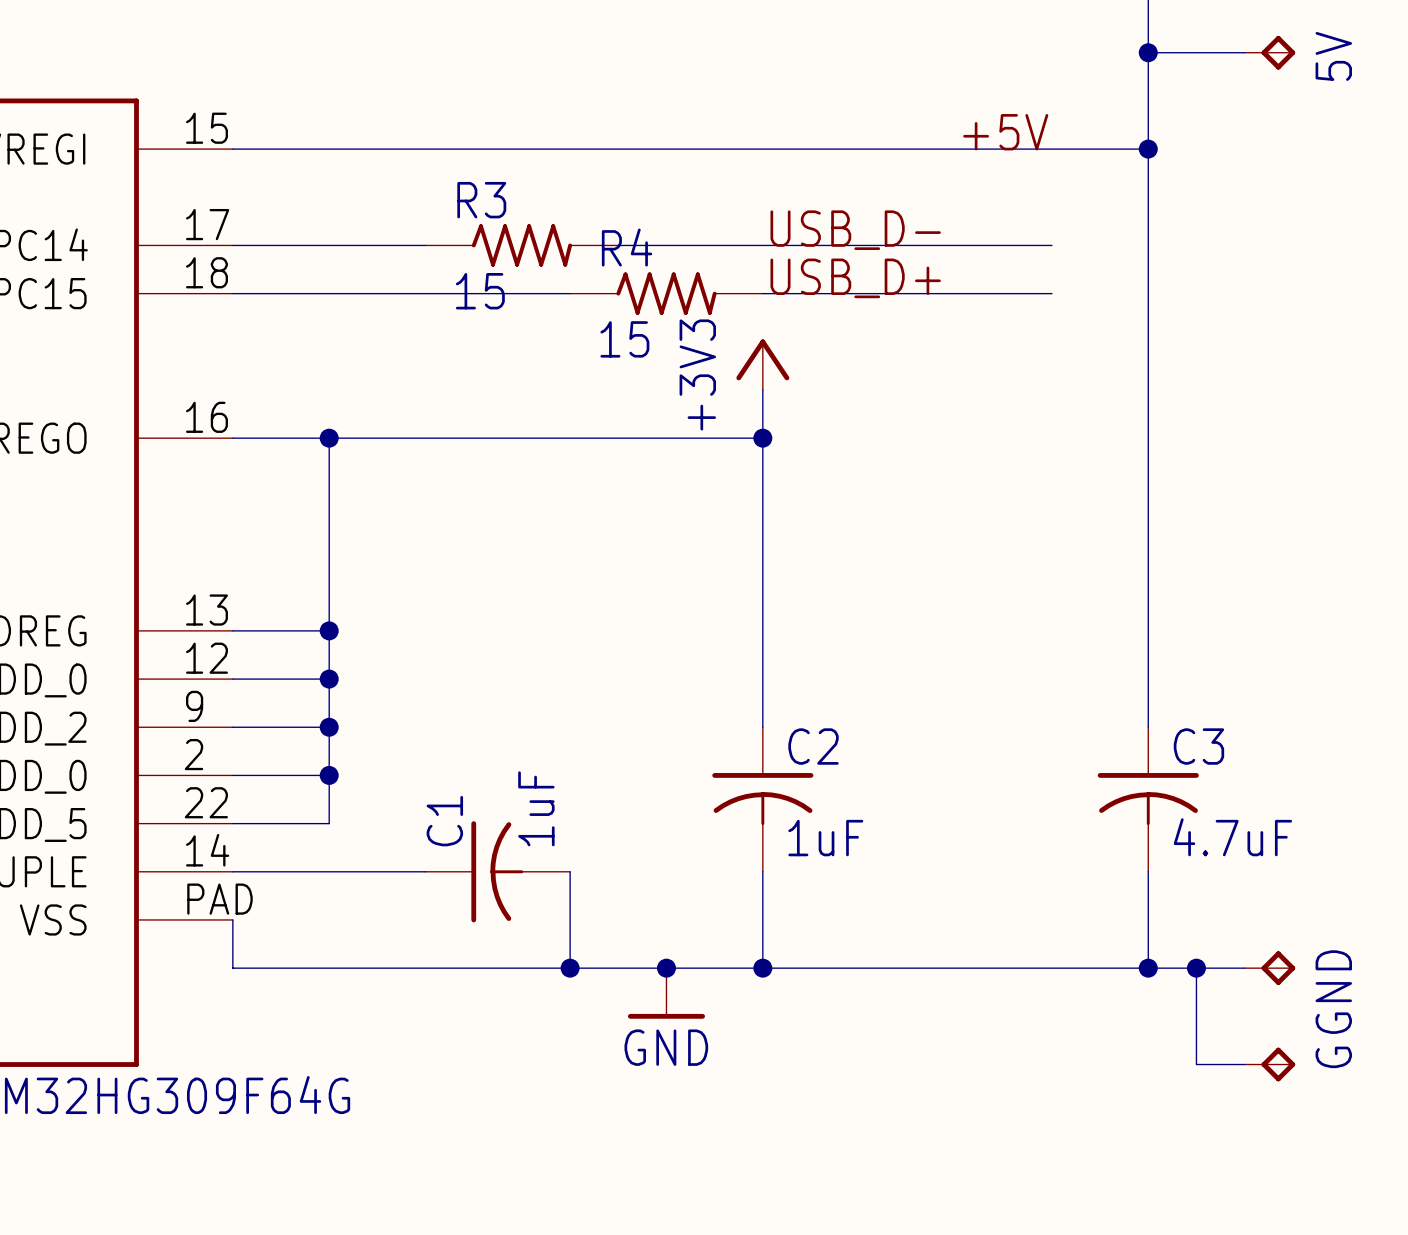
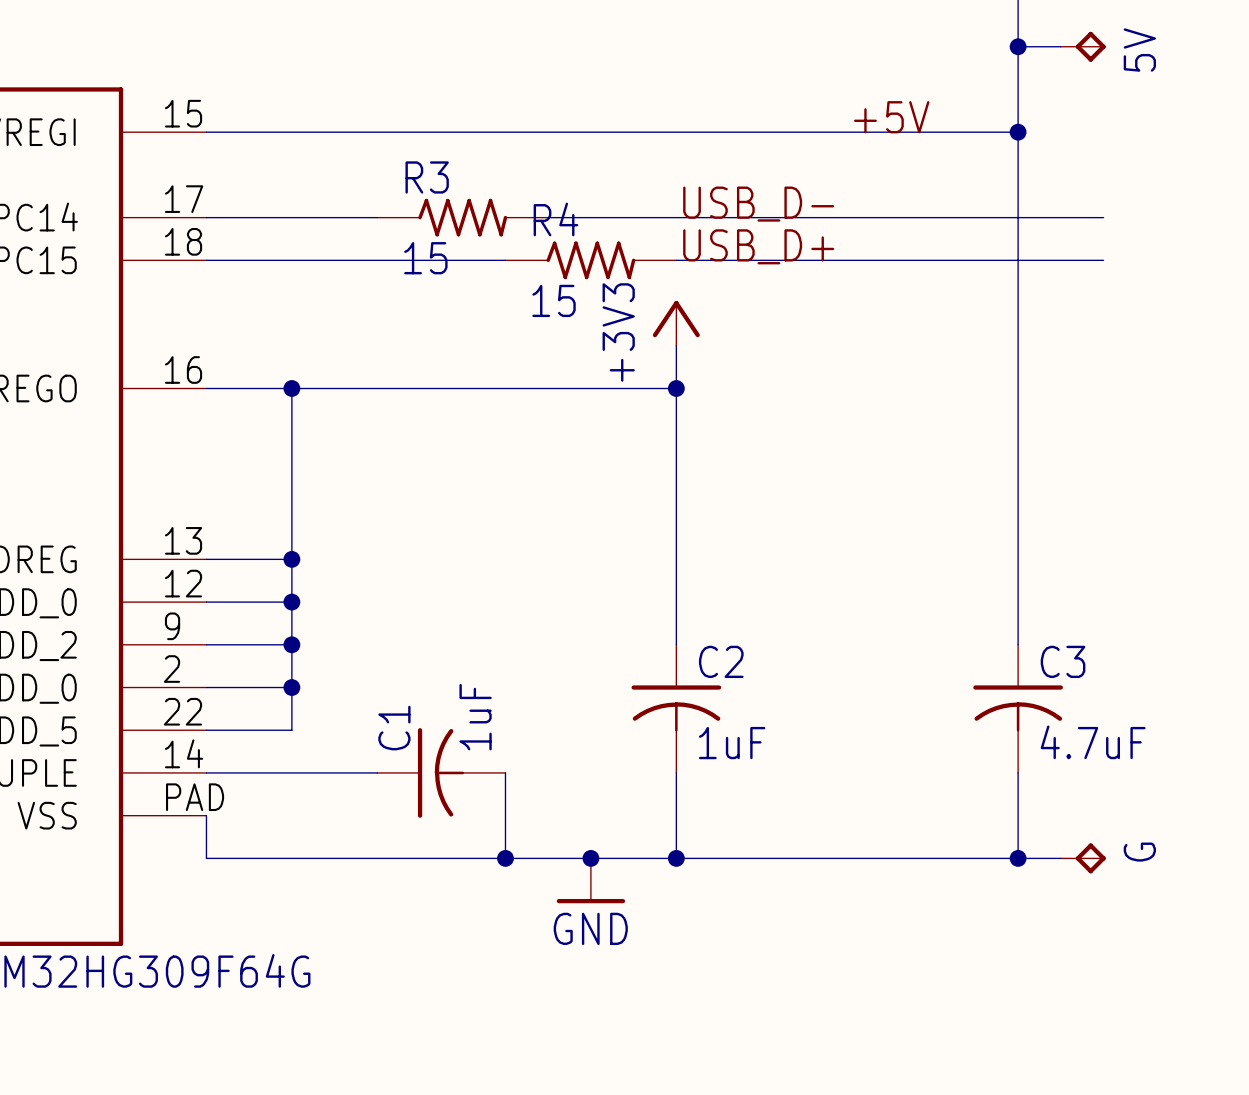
5V position: (1269, 52) -> (1083, 46)
wire: none -> (932, 217) (1103, 217)
wire: none -> (932, 260) (1103, 260)
junction: (1196, 968) -> none
wire: (1244, 968) (1196, 968) (1196, 1064) (1244, 1064) -> none
GND: (1269, 968) -> none
G position: (1269, 1064) -> (1083, 858)

